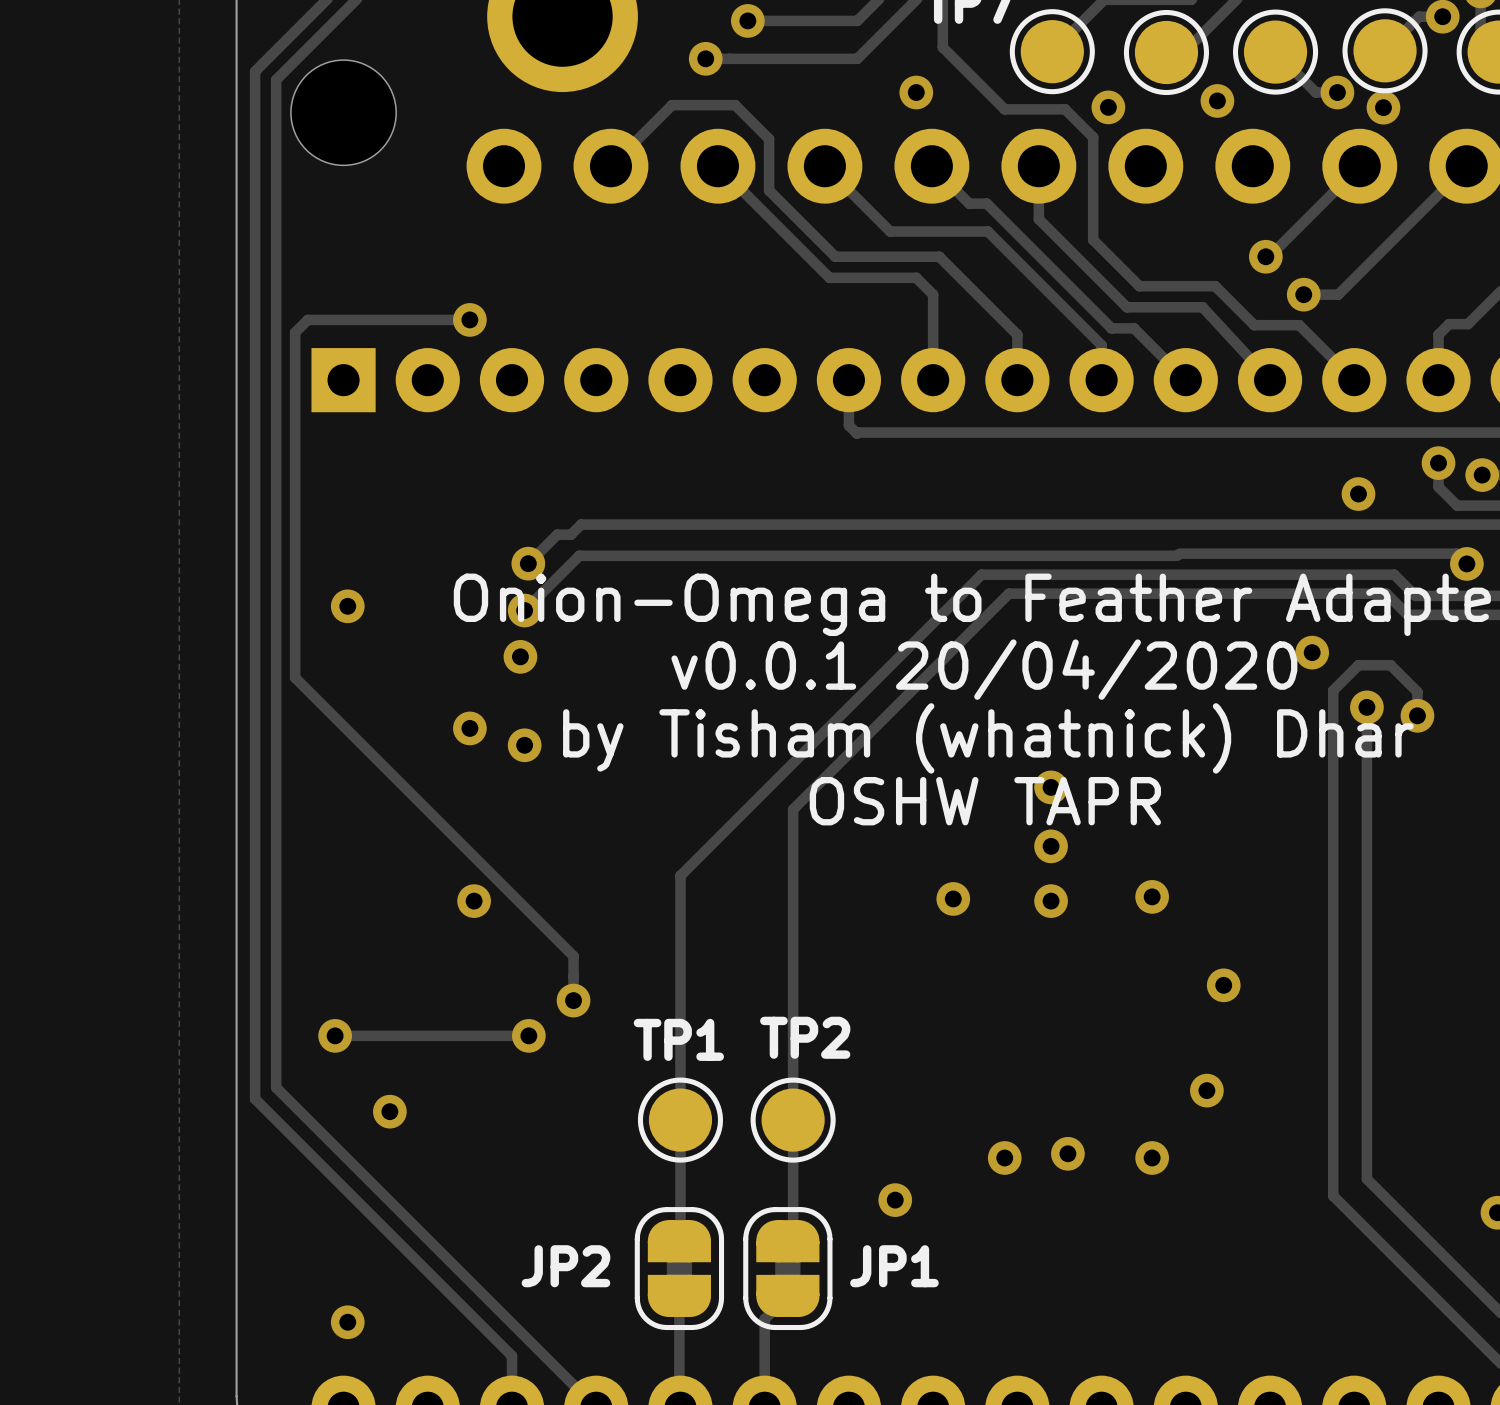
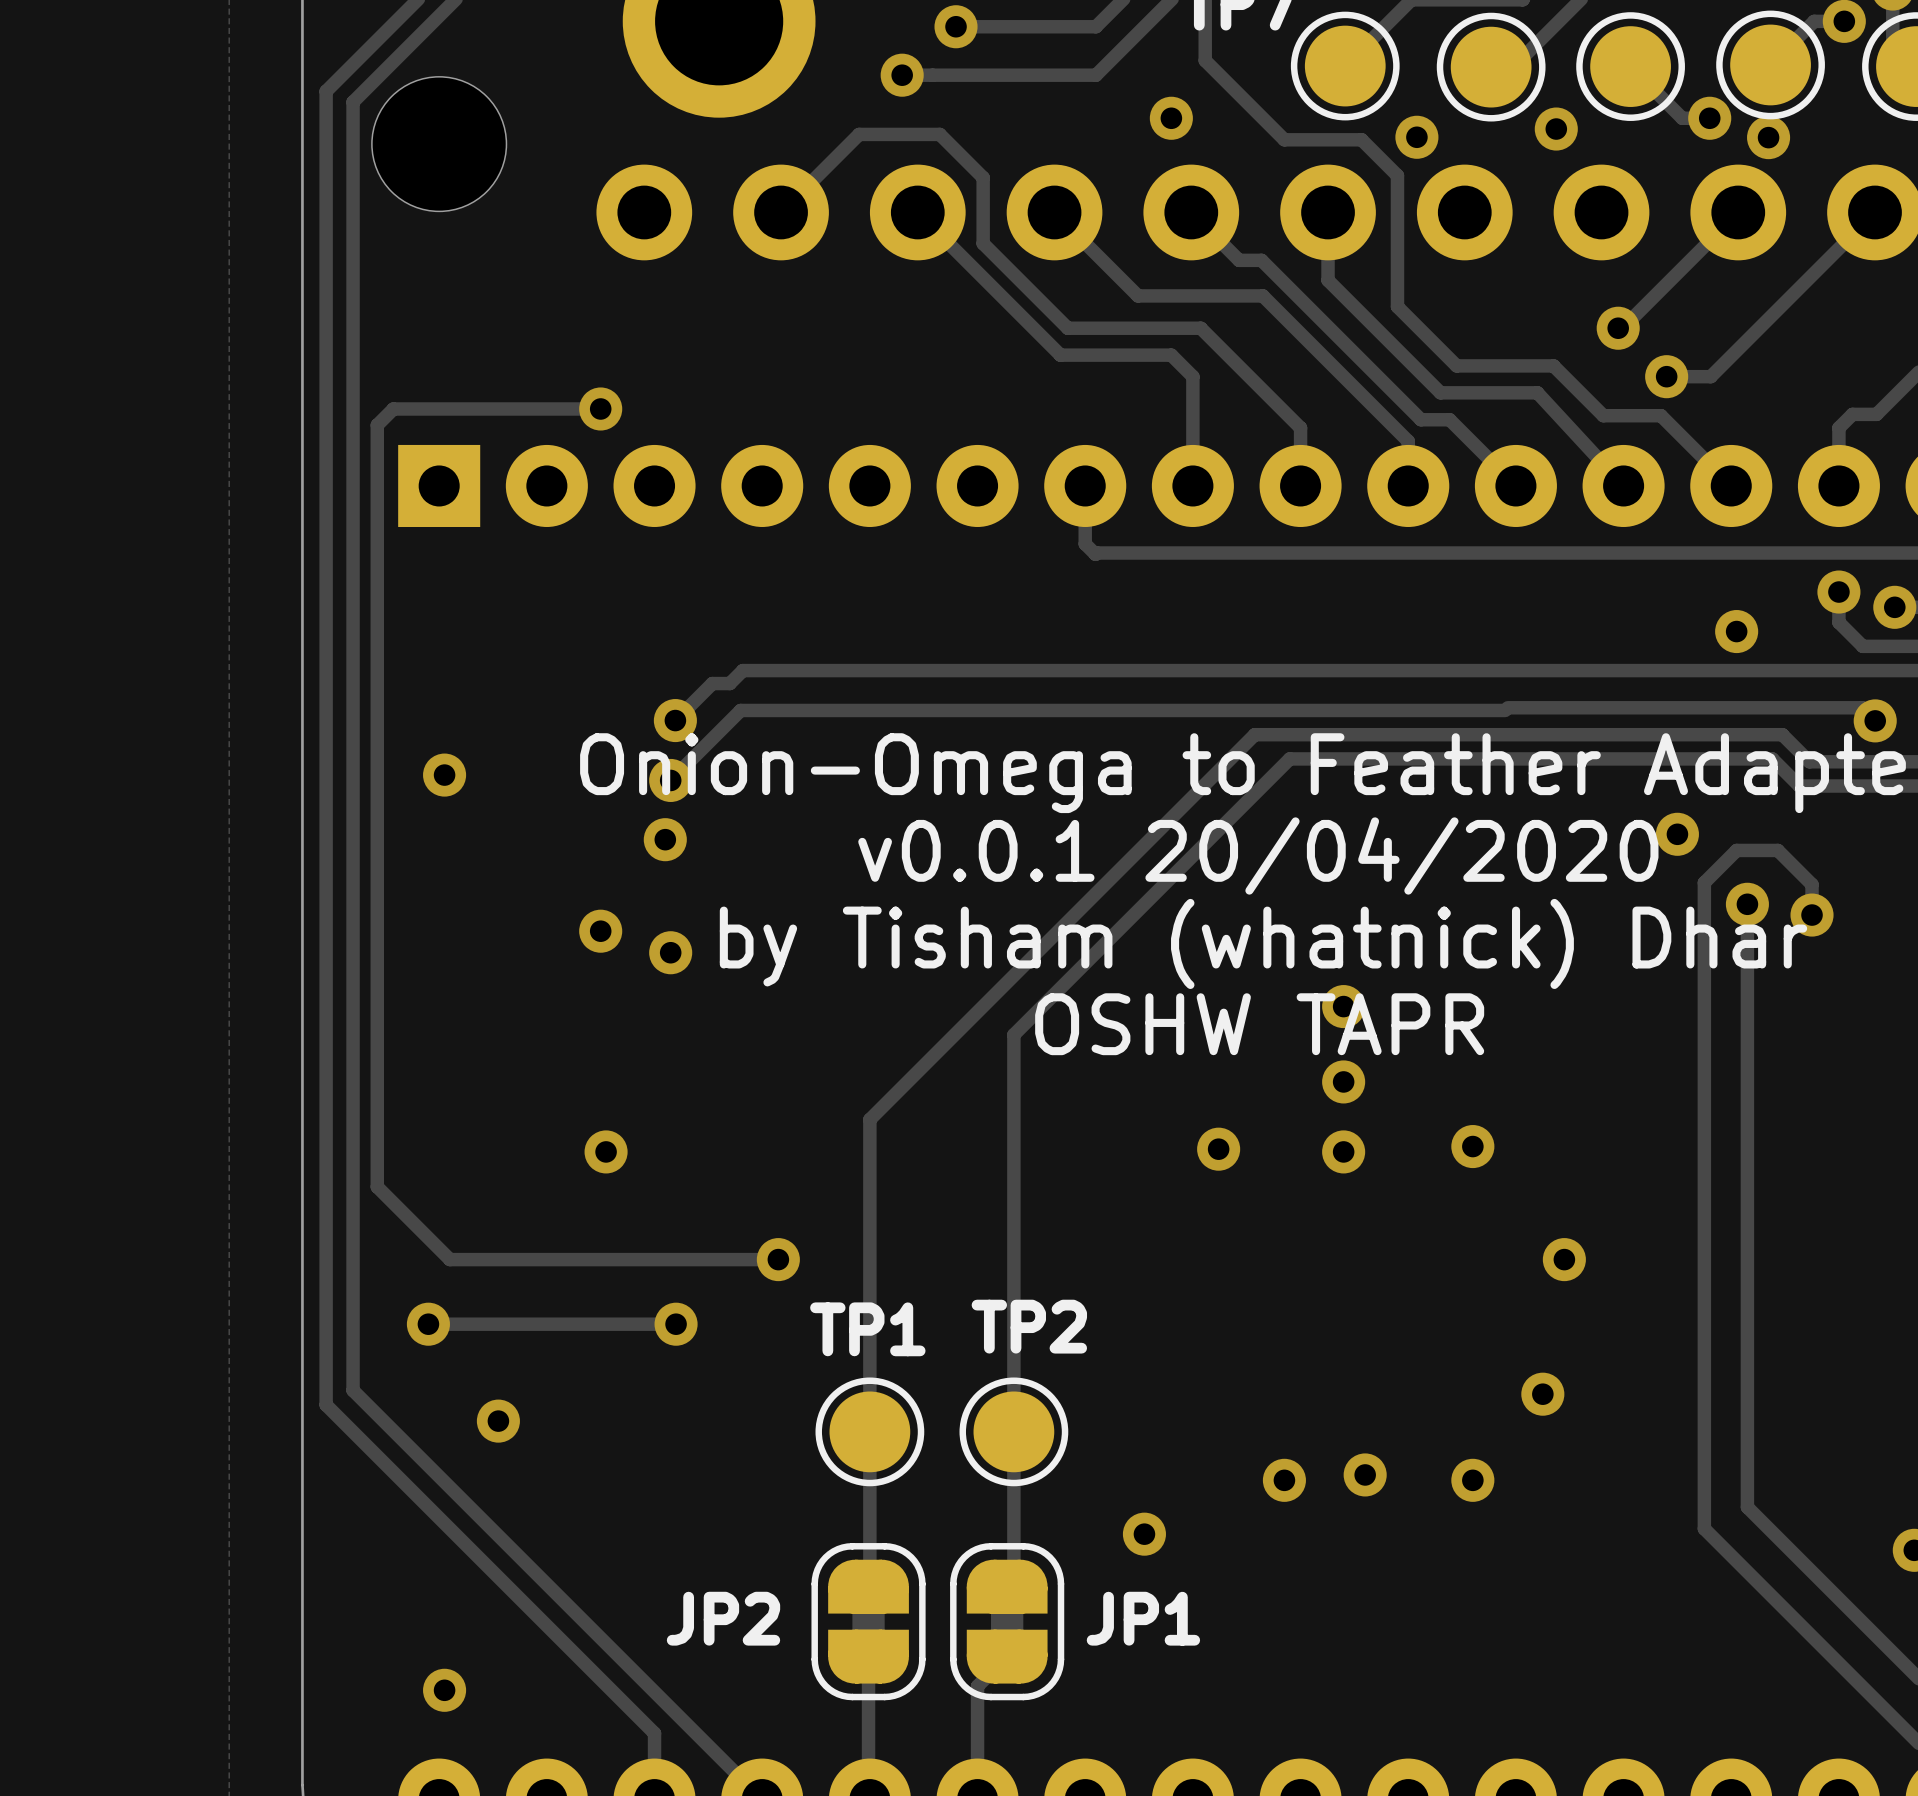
track: (295, 677) (573, 956) (573, 1000) -> (377, 866) (377, 1186) (449, 1259) (778, 1259)
via position: (573, 1000) -> (778, 1259)

